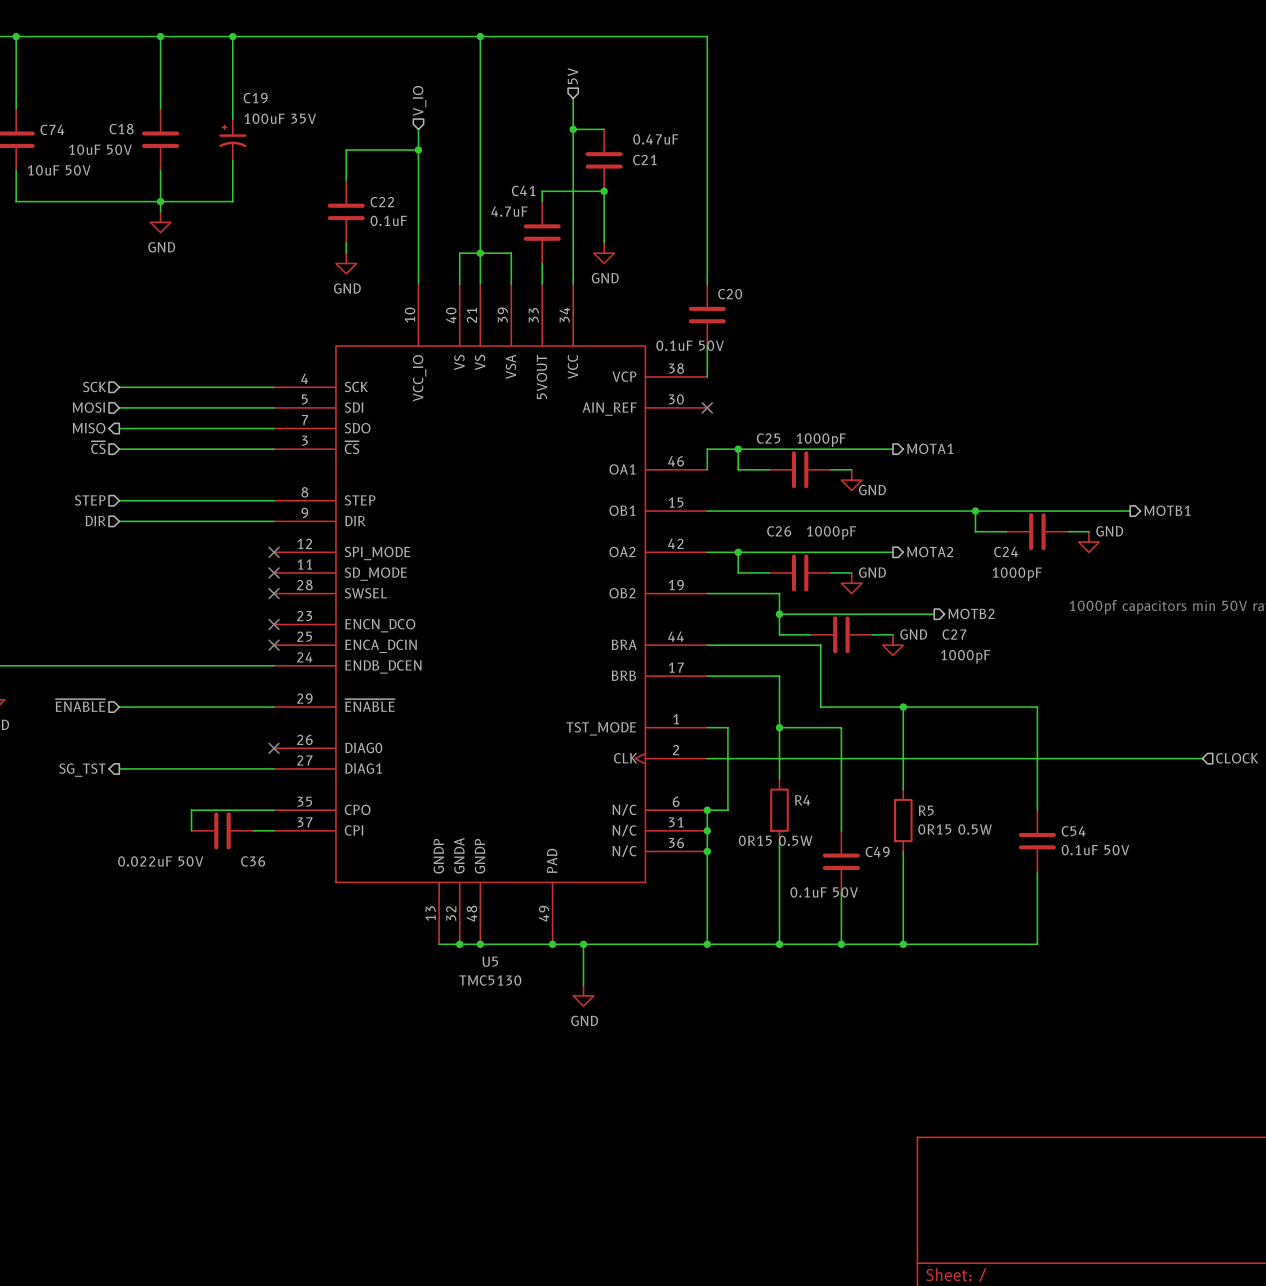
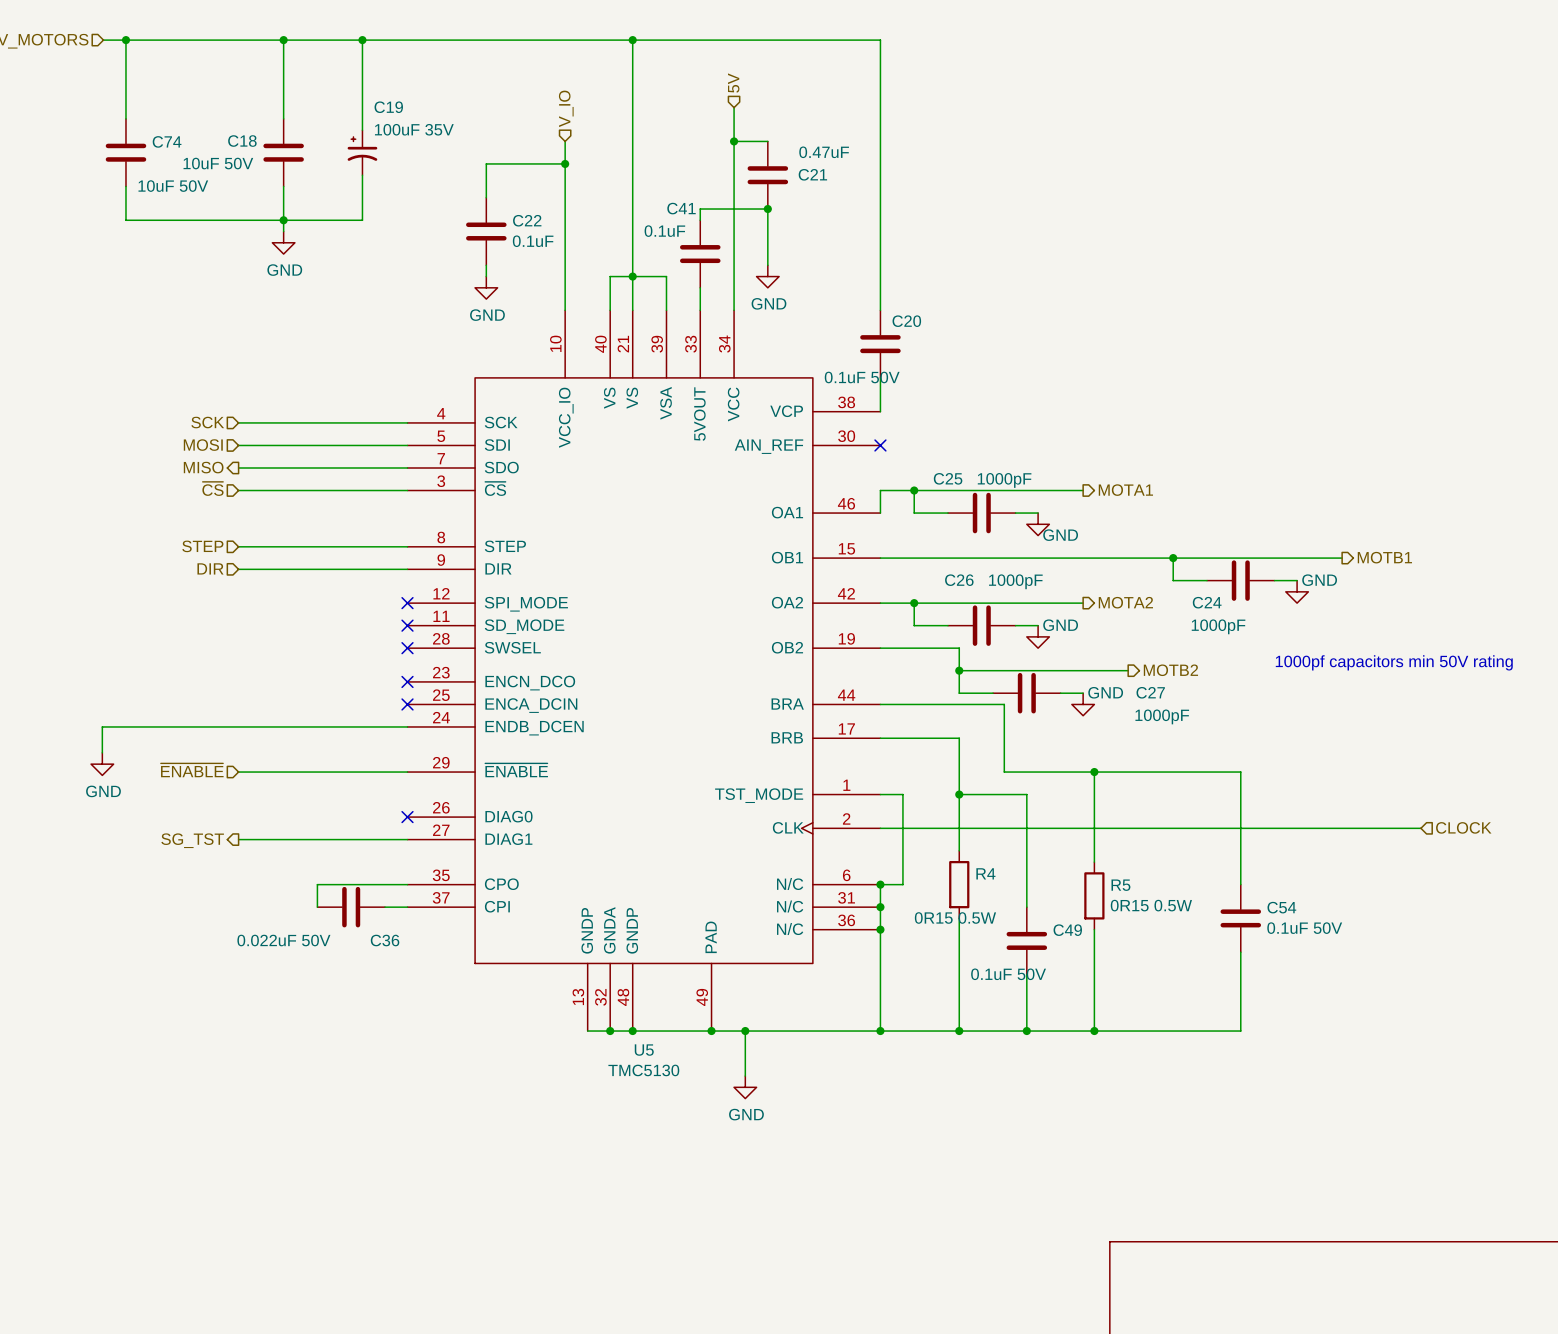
C41 value: 4.7uF (509, 211) -> 0.1uF (664, 231)

